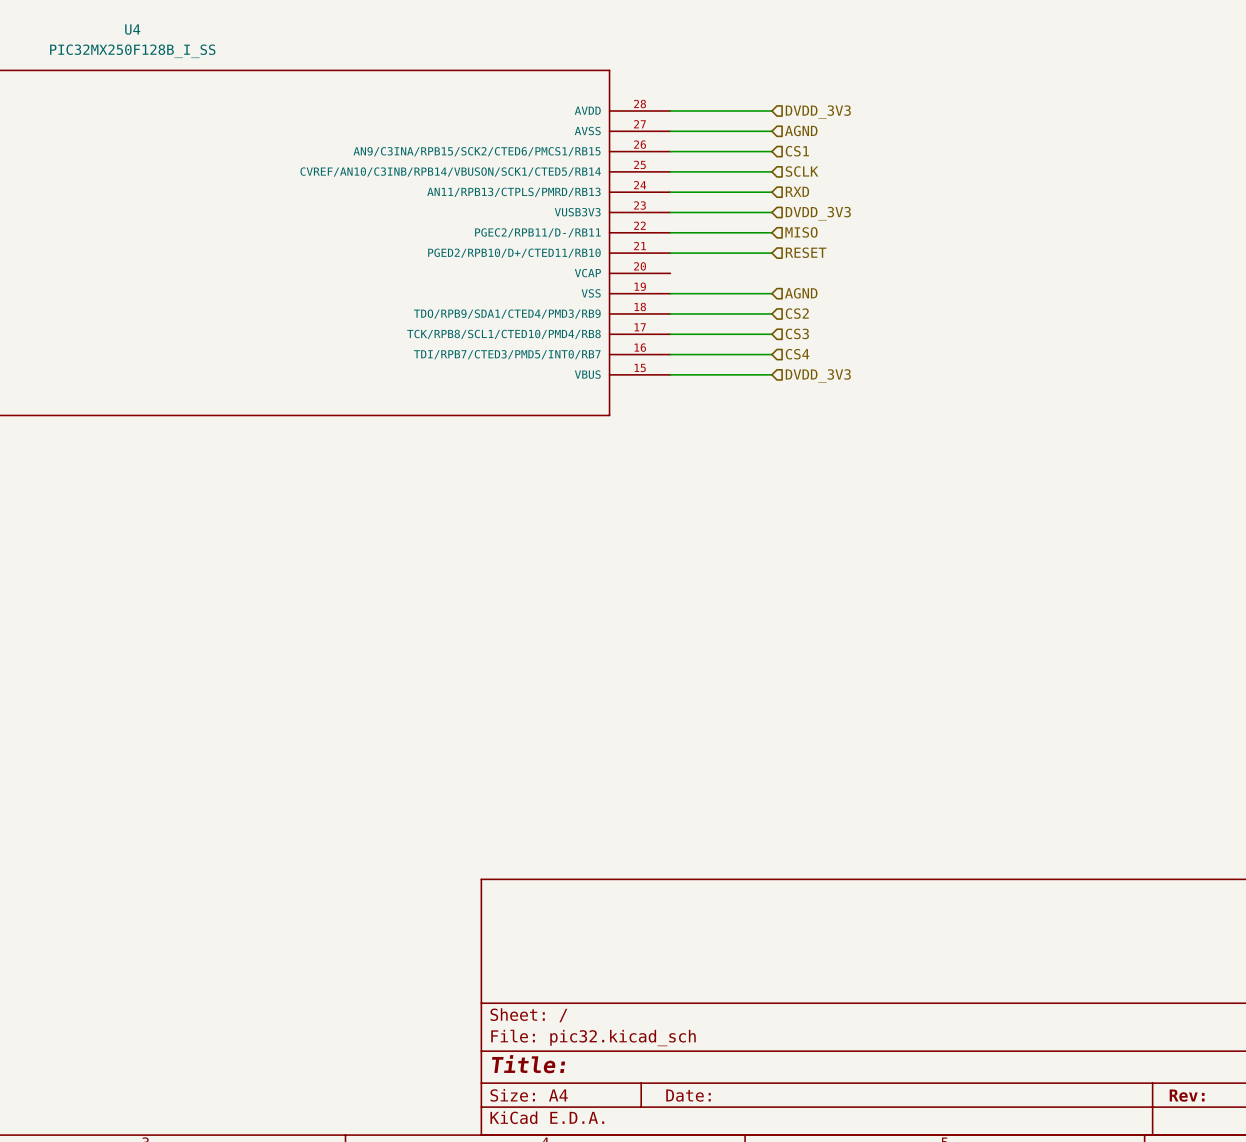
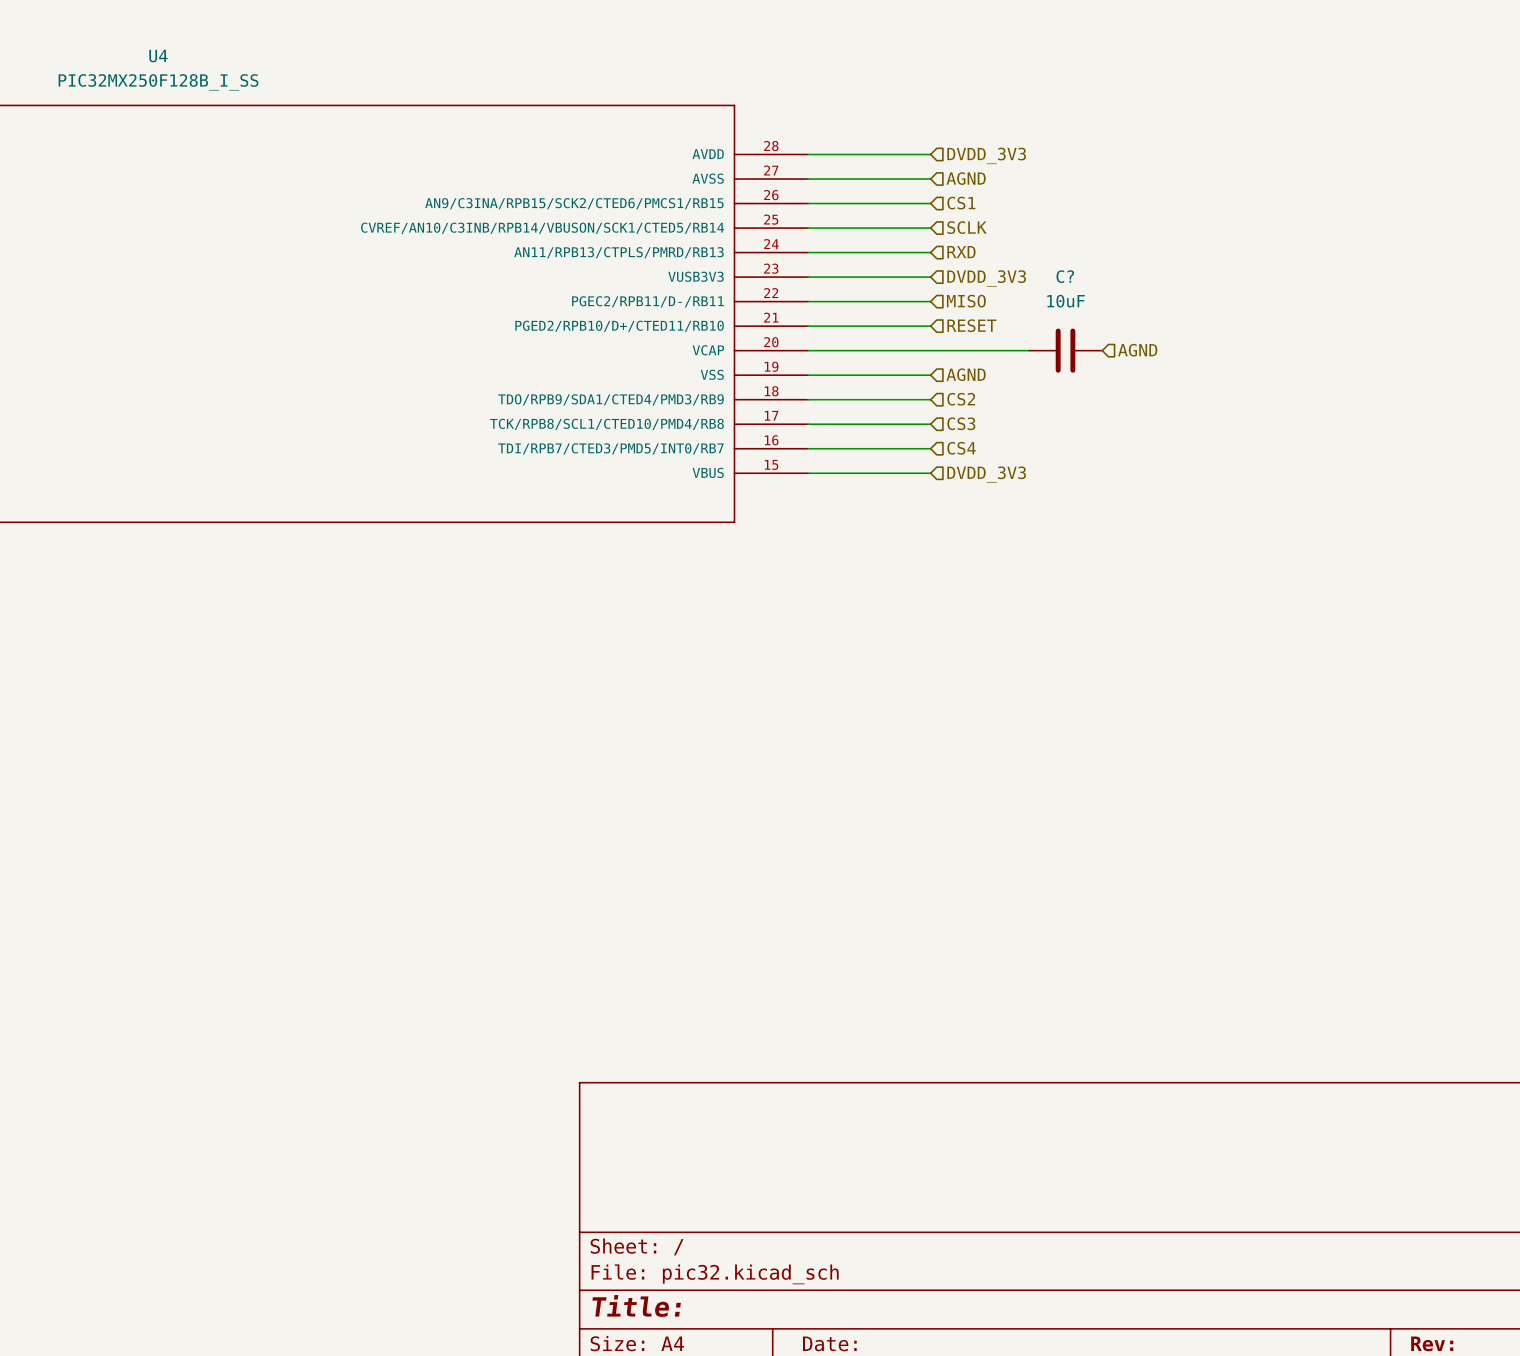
wire: none -> (808, 350) (1028, 350)
C?: none -> 10uF (1065, 350)
hierarchical label: none -> AGND (1137, 350)

